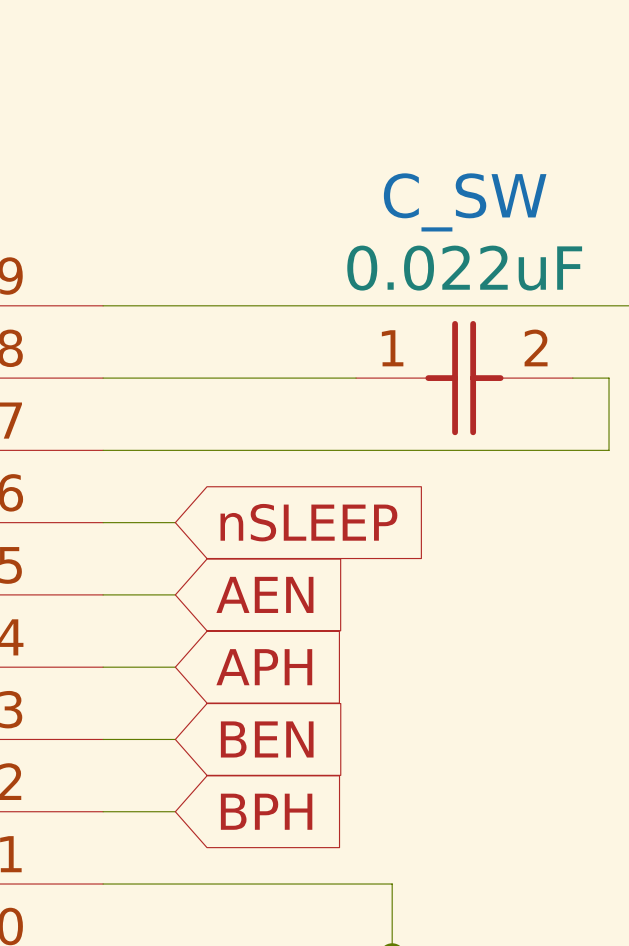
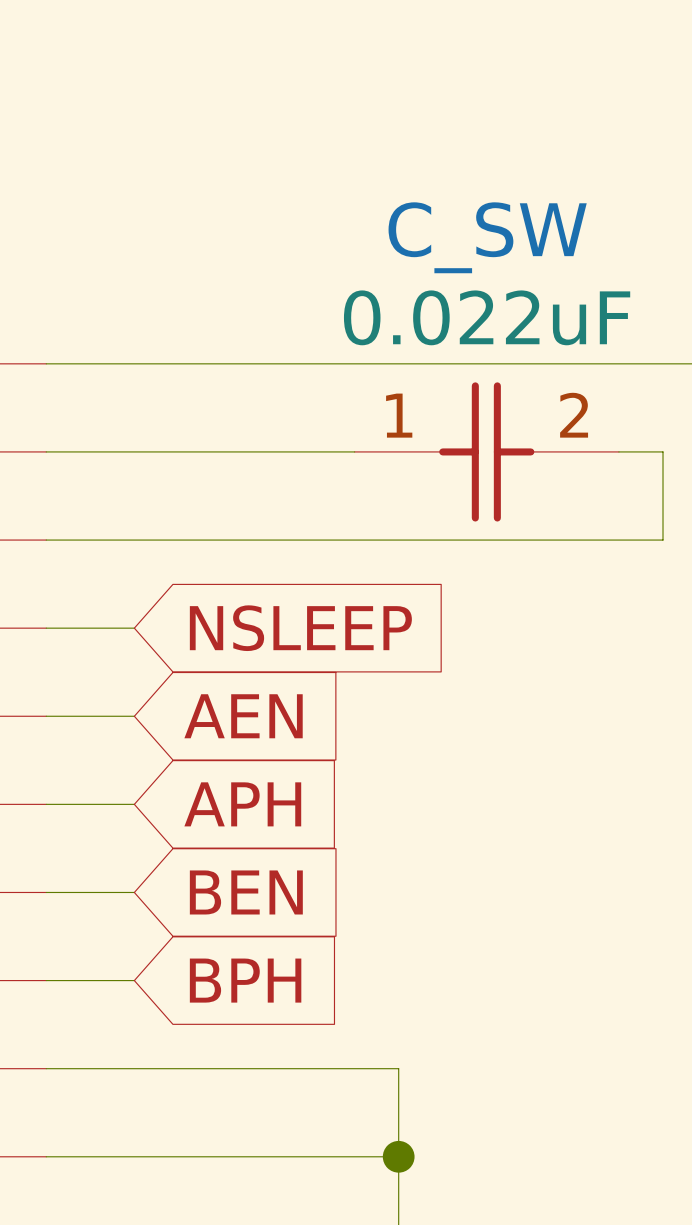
global label: nSLEEP (308, 522) -> NSLEEP (300, 628)

